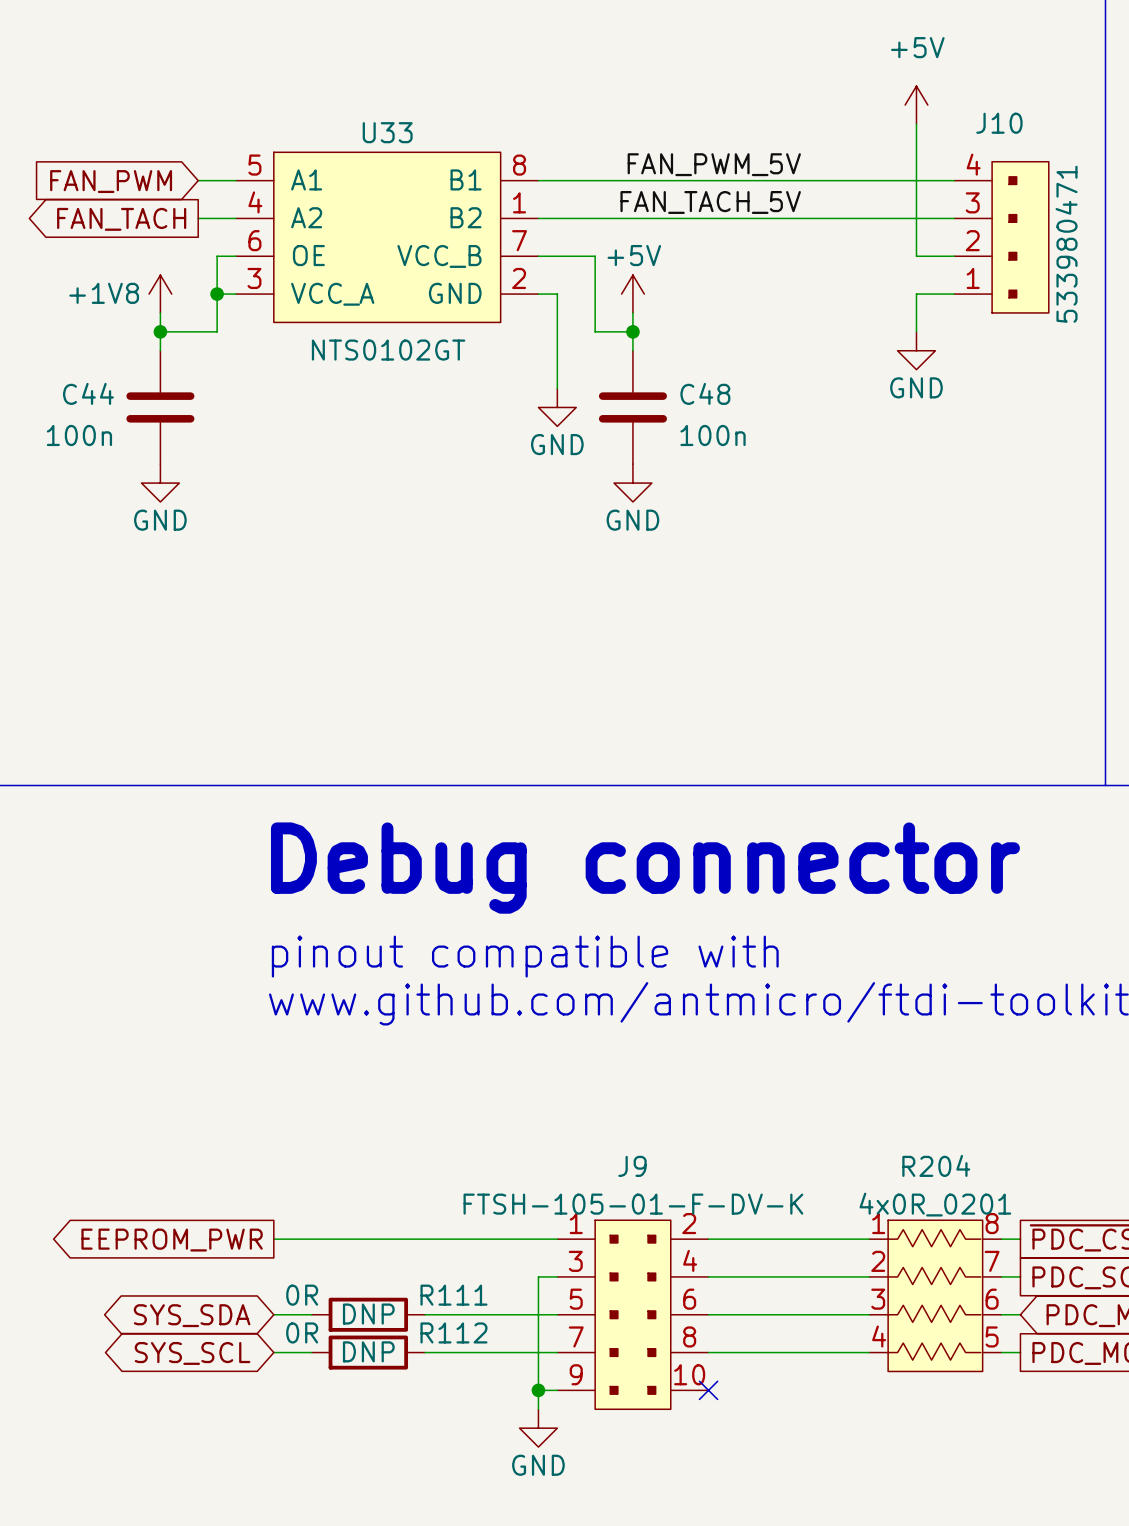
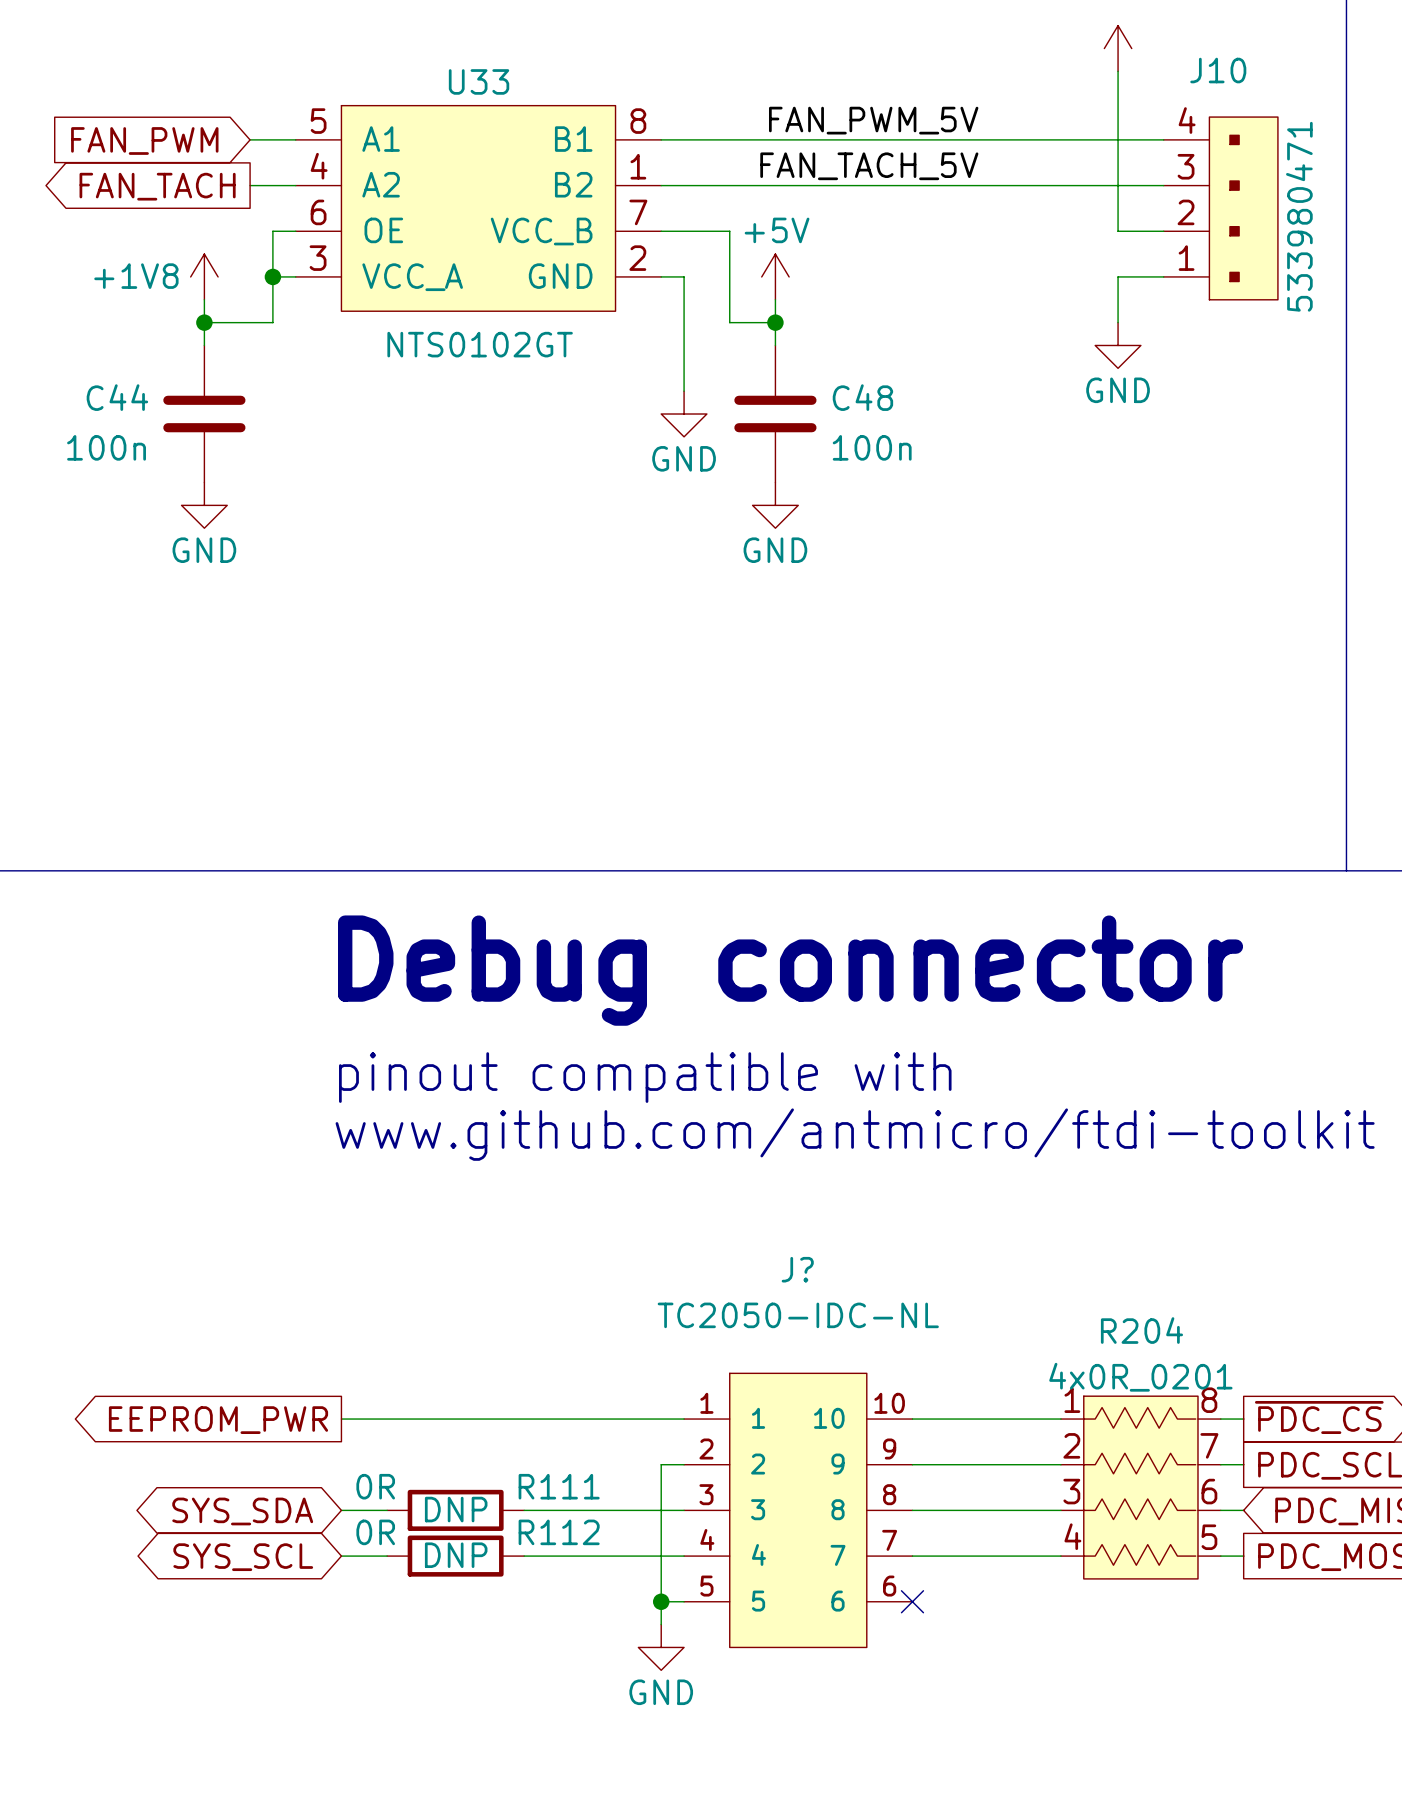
J9: FTSH-105-01-F-DV-K (632, 1314) -> none
J?: none -> TC2050-IDC-NL (798, 1510)
no-connect mark position: (708, 1390) -> (912, 1601)

